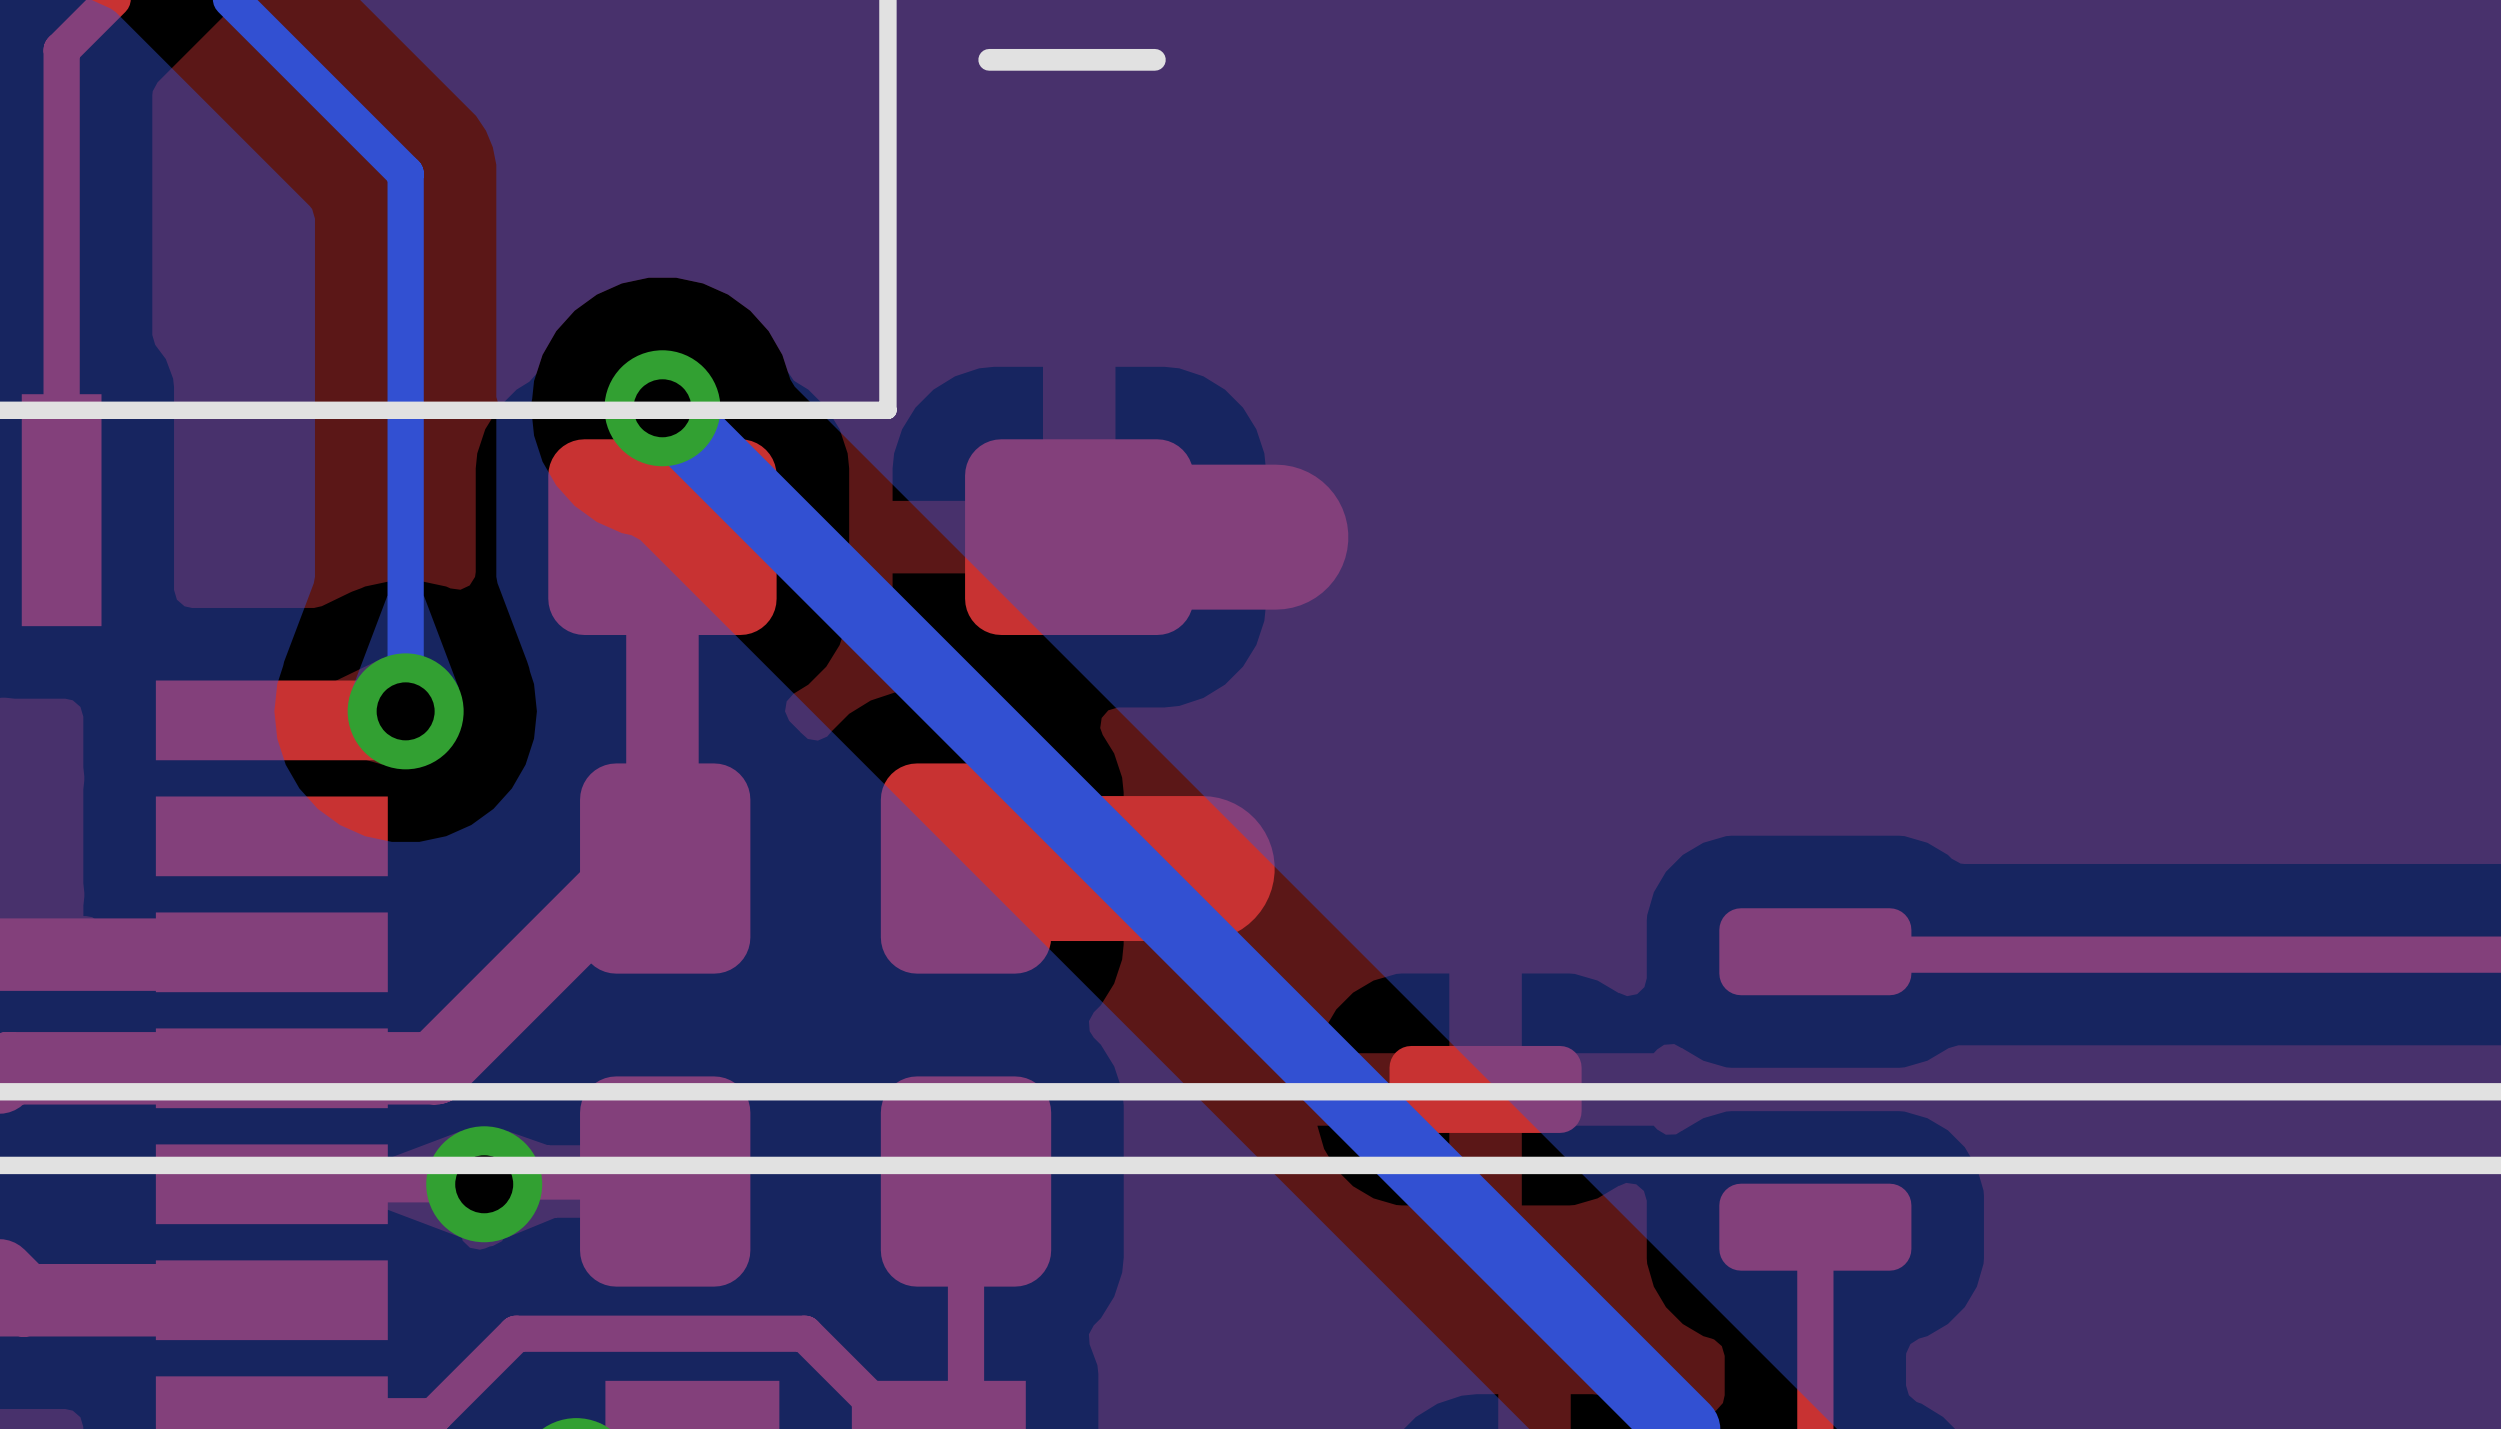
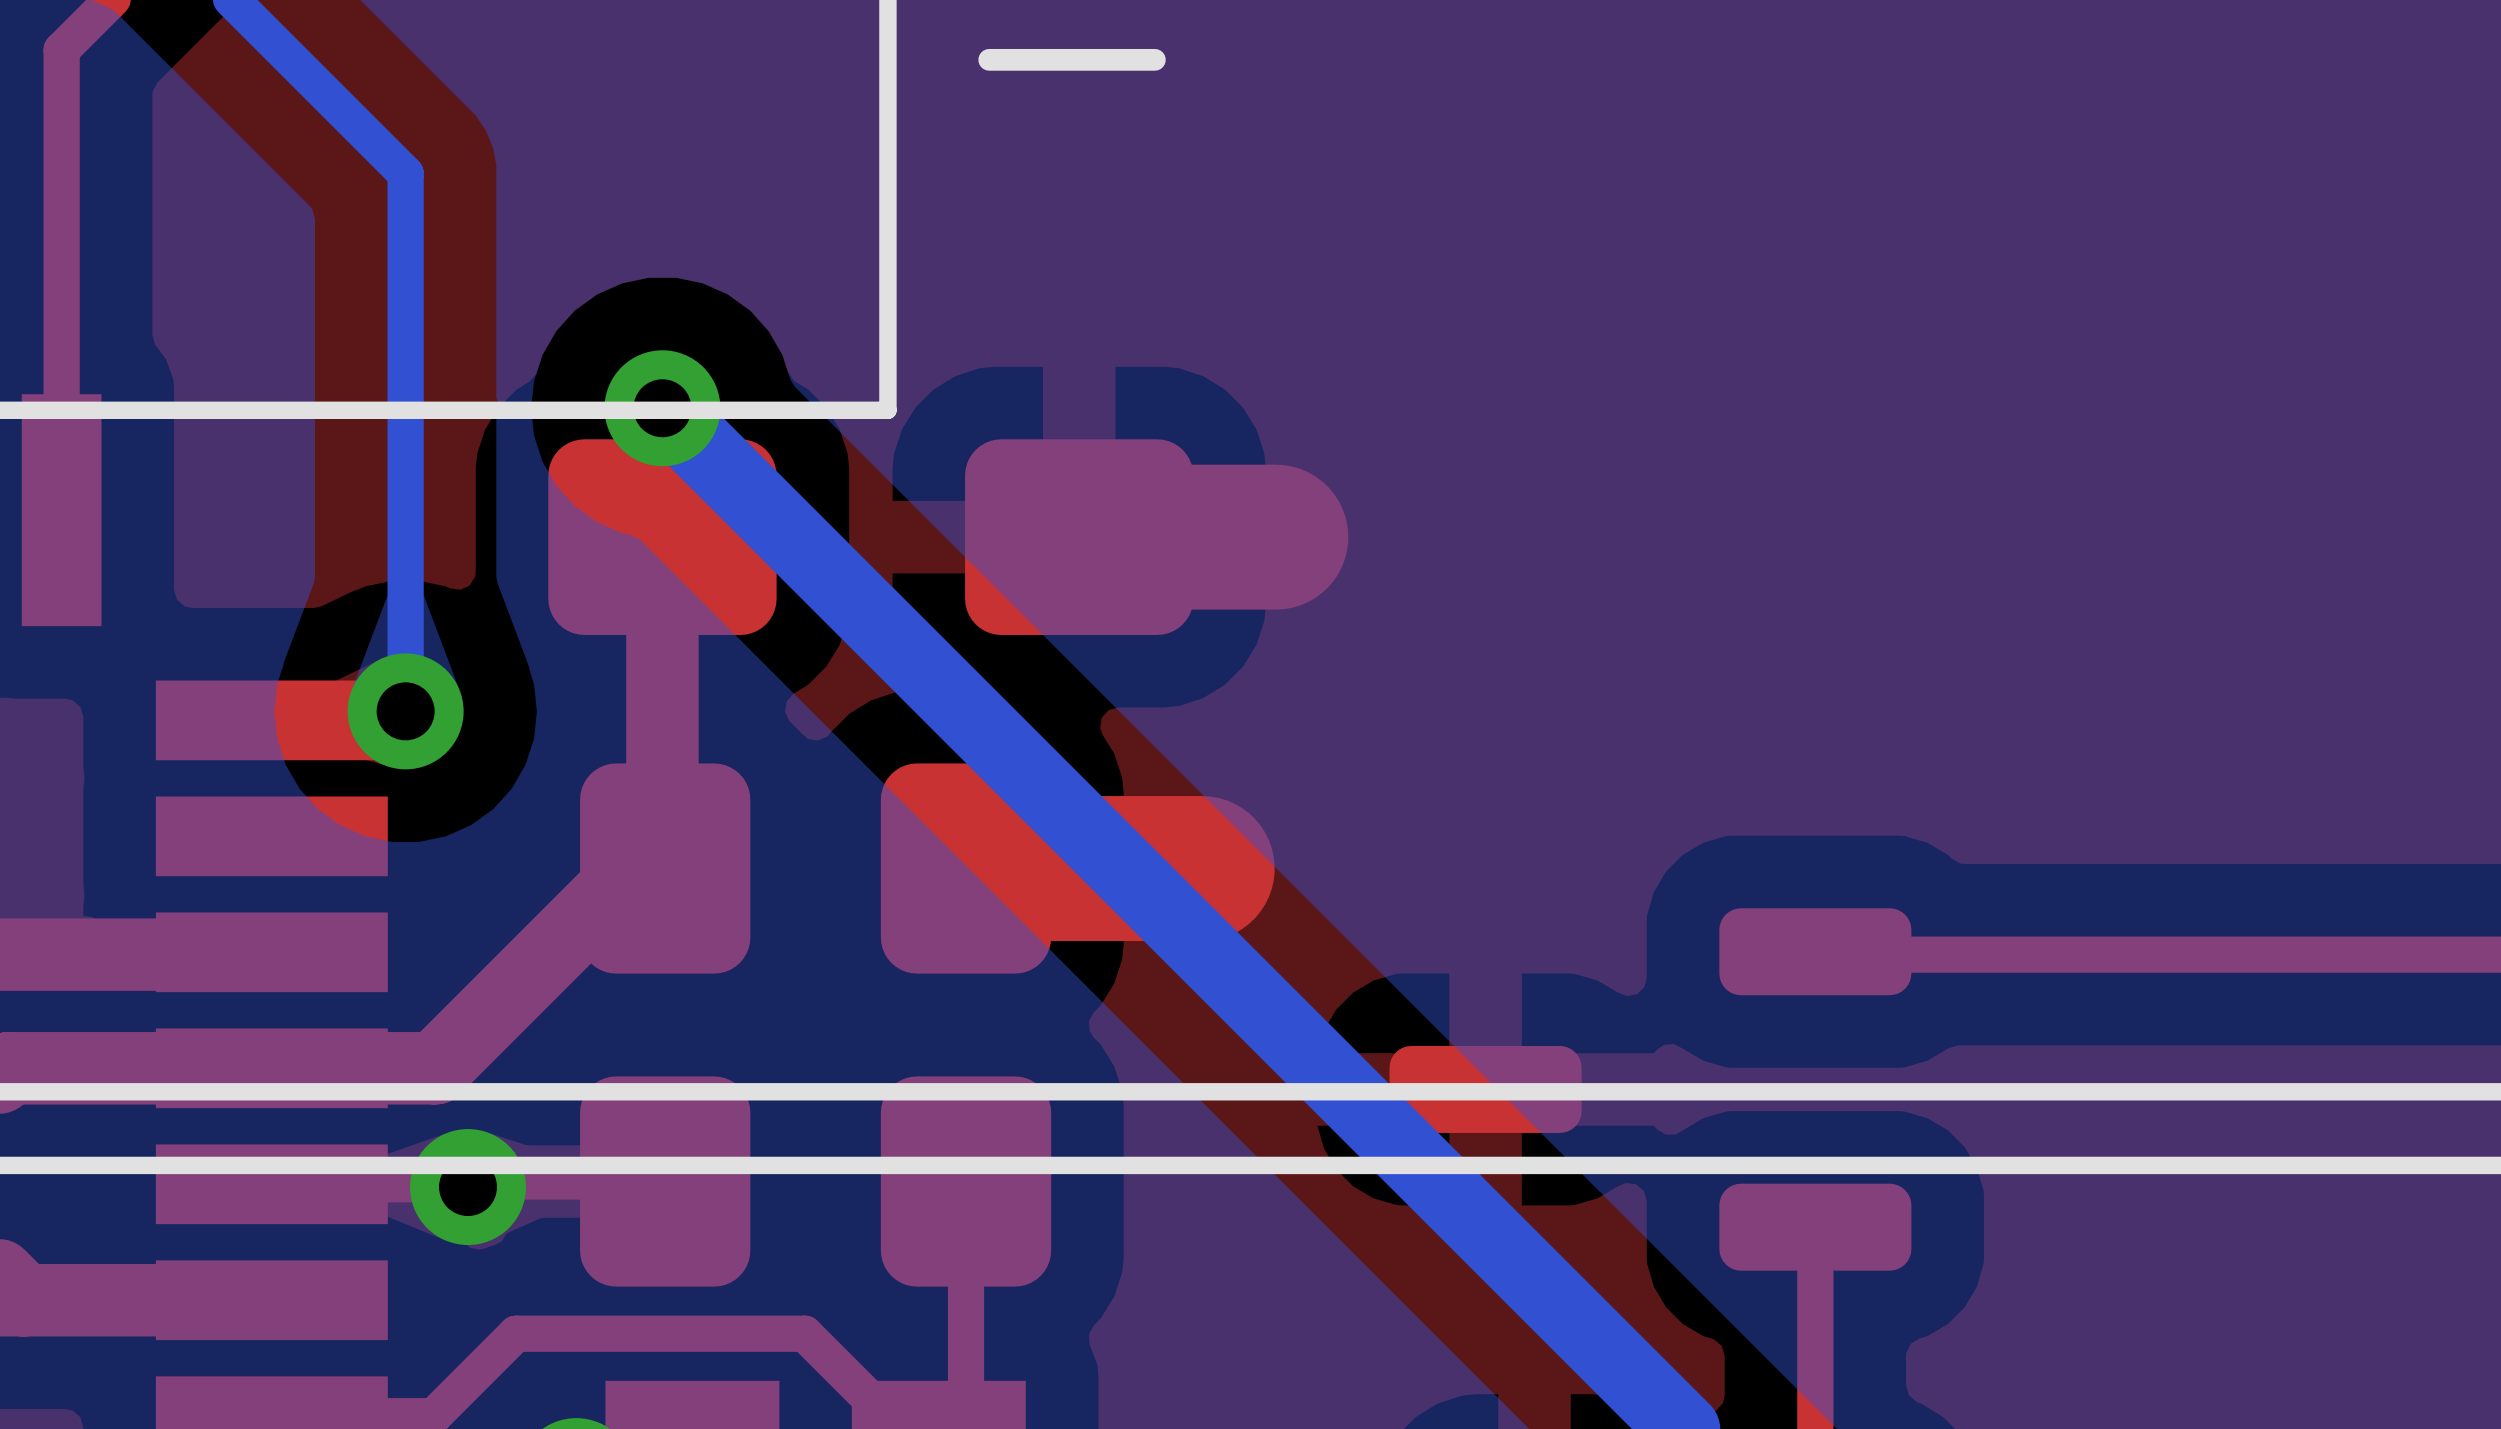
via position: (484, 1184) -> (468, 1187)

